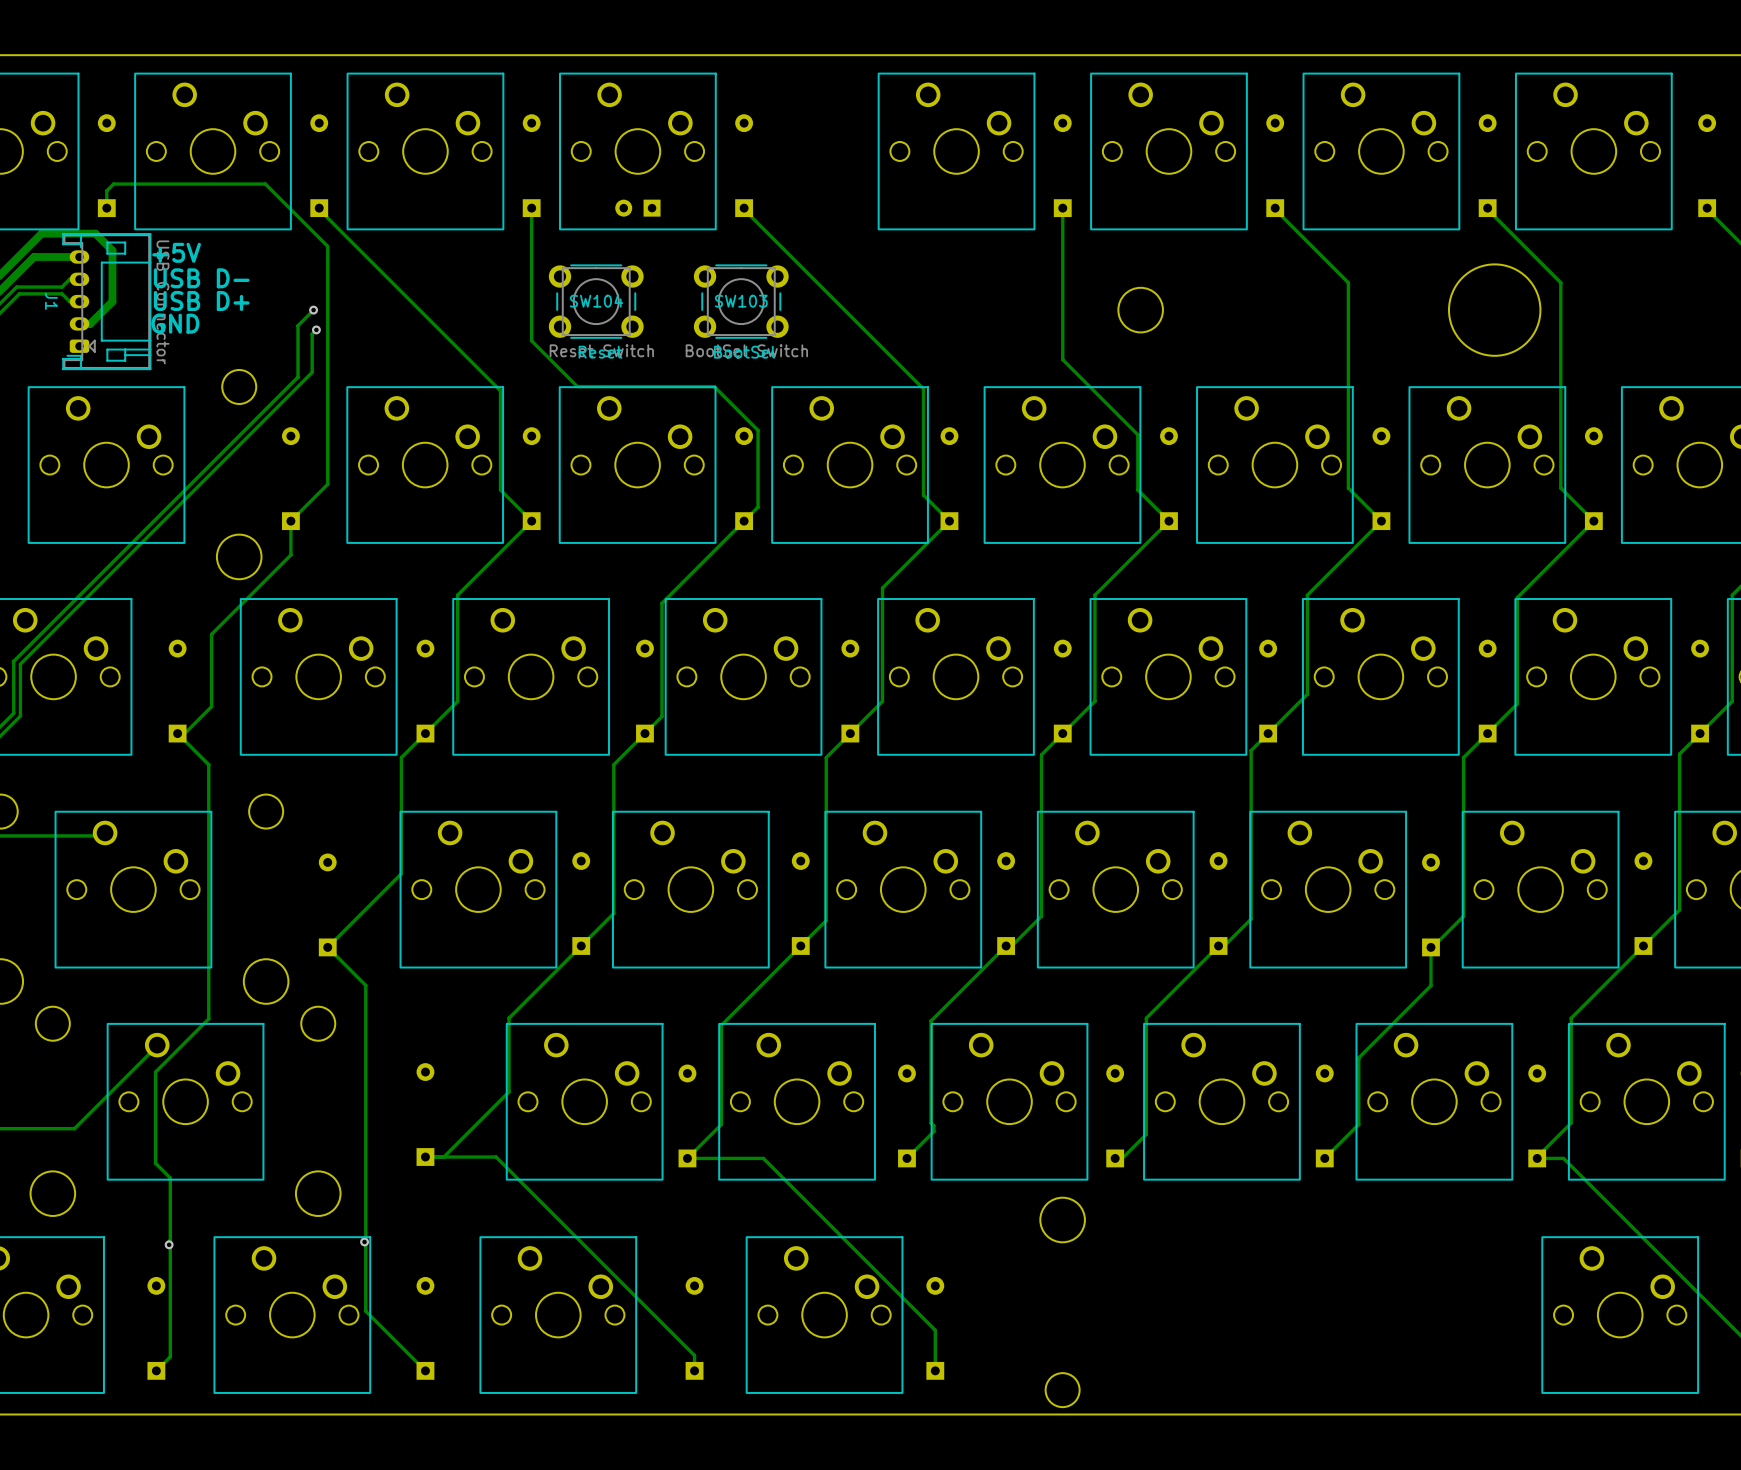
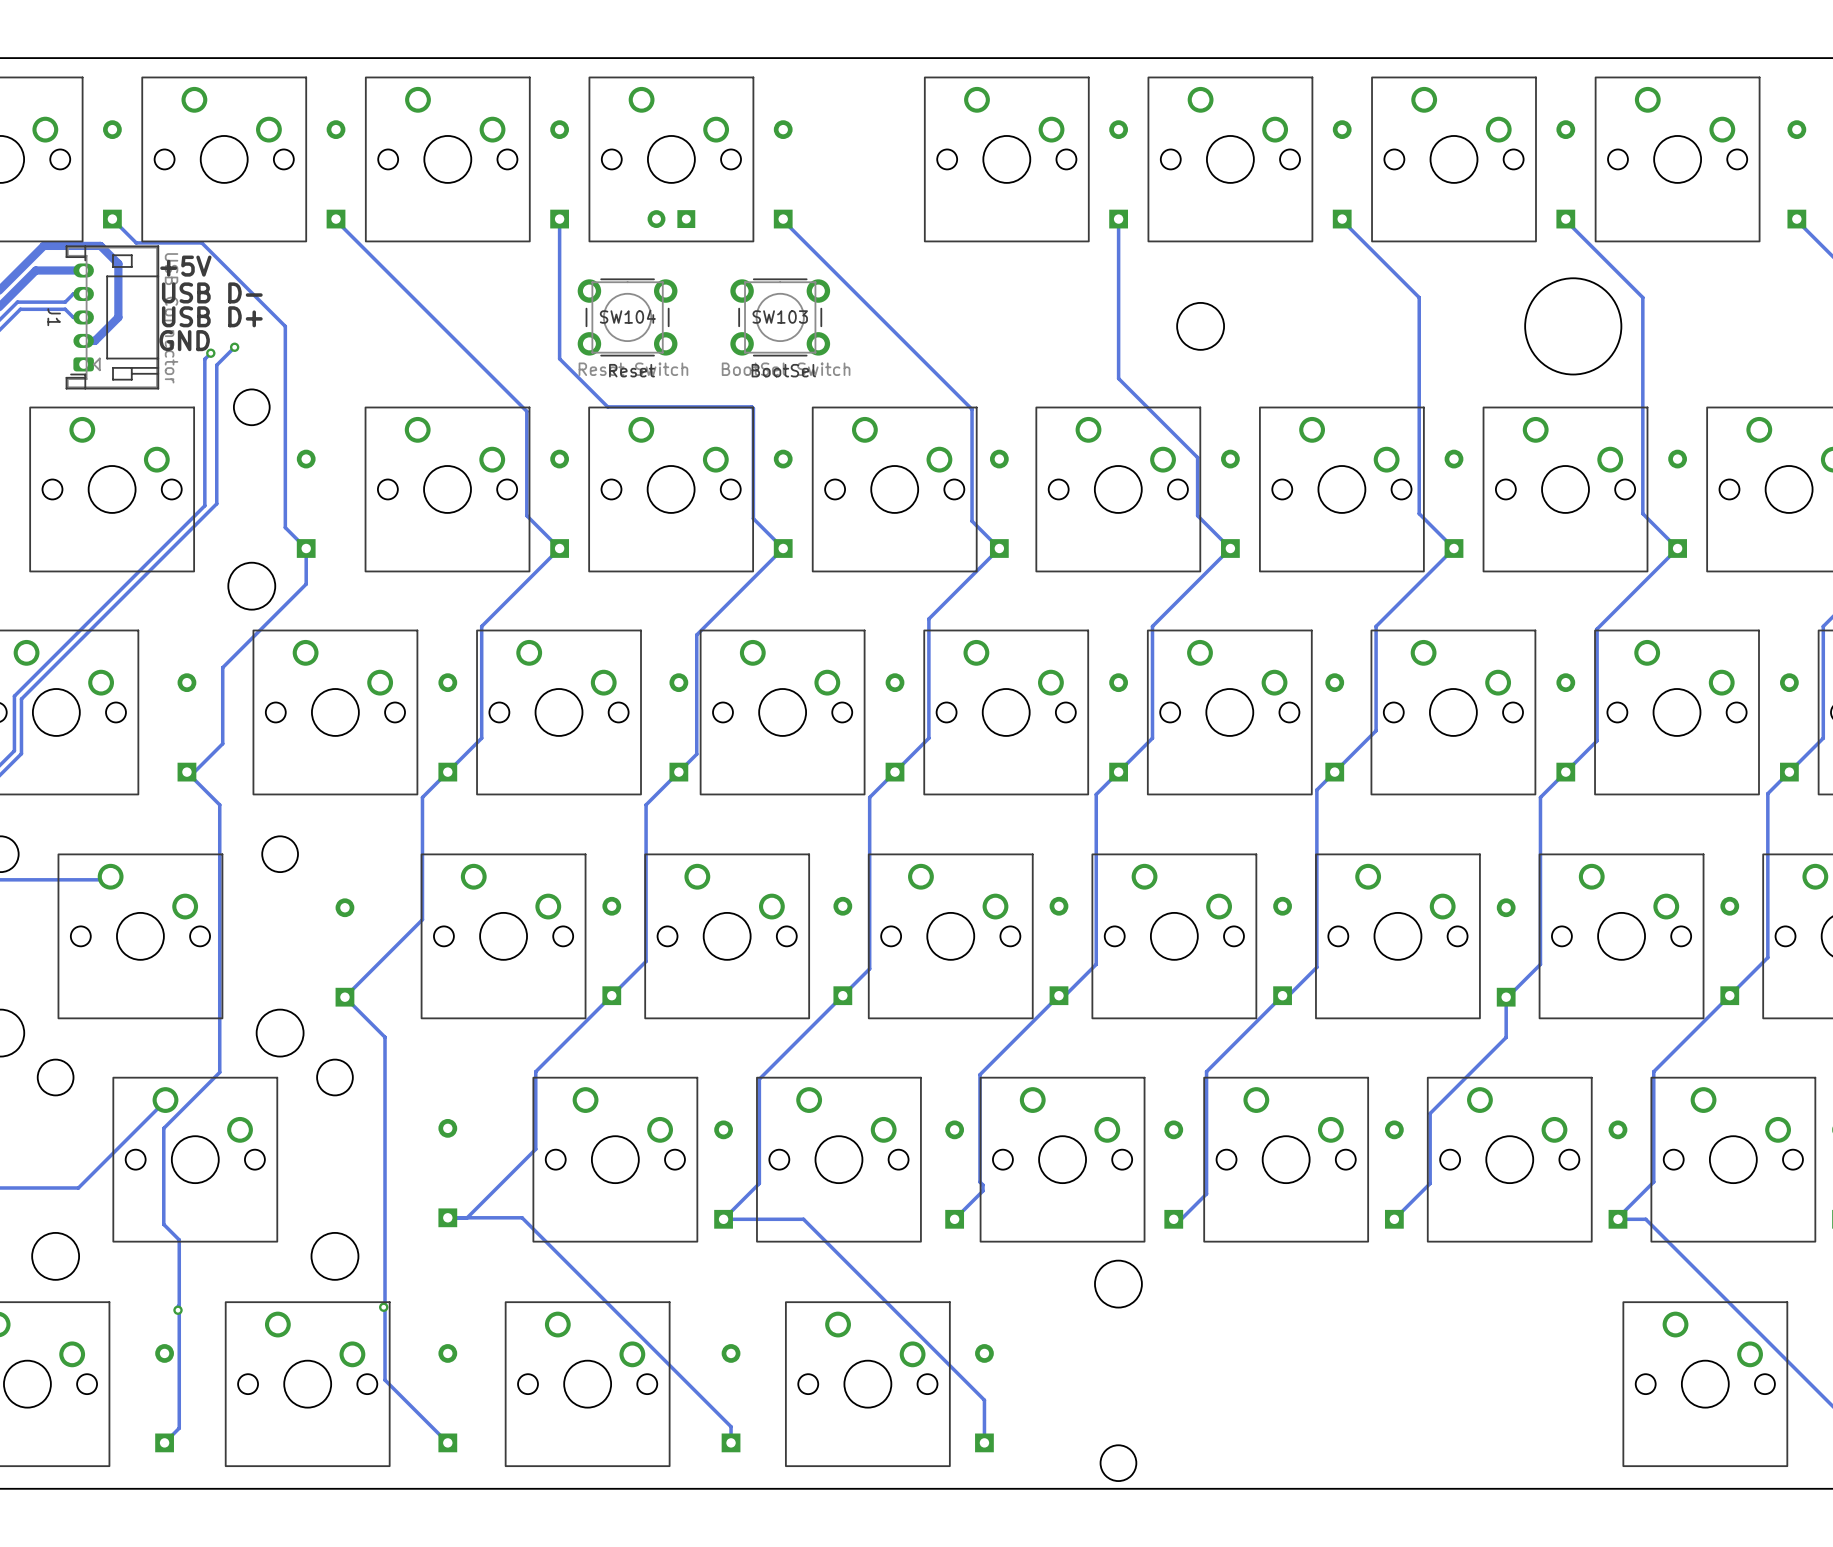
track: (106, 208) (106, 190) (113, 184) (265, 184) (327, 246) -> none
track: (327, 247) (327, 484) (290, 521) -> (112, 219) (136, 242) (201, 242) (285, 326) (285, 527) (306, 548)
track: (313, 310) (297, 325) (297, 377) (194, 480) -> (210, 353) (204, 359) (204, 505)
via: (313, 310) -> none
via: none -> (234, 347)
track: (316, 329) (312, 334) (312, 372) (205, 478) -> (234, 347) (216, 365) (216, 503)
via: (316, 329) -> none
via: none -> (210, 353)
track: (715, 388) (758, 430) (758, 507) (744, 521) -> (753, 408) (753, 518) (783, 548)

